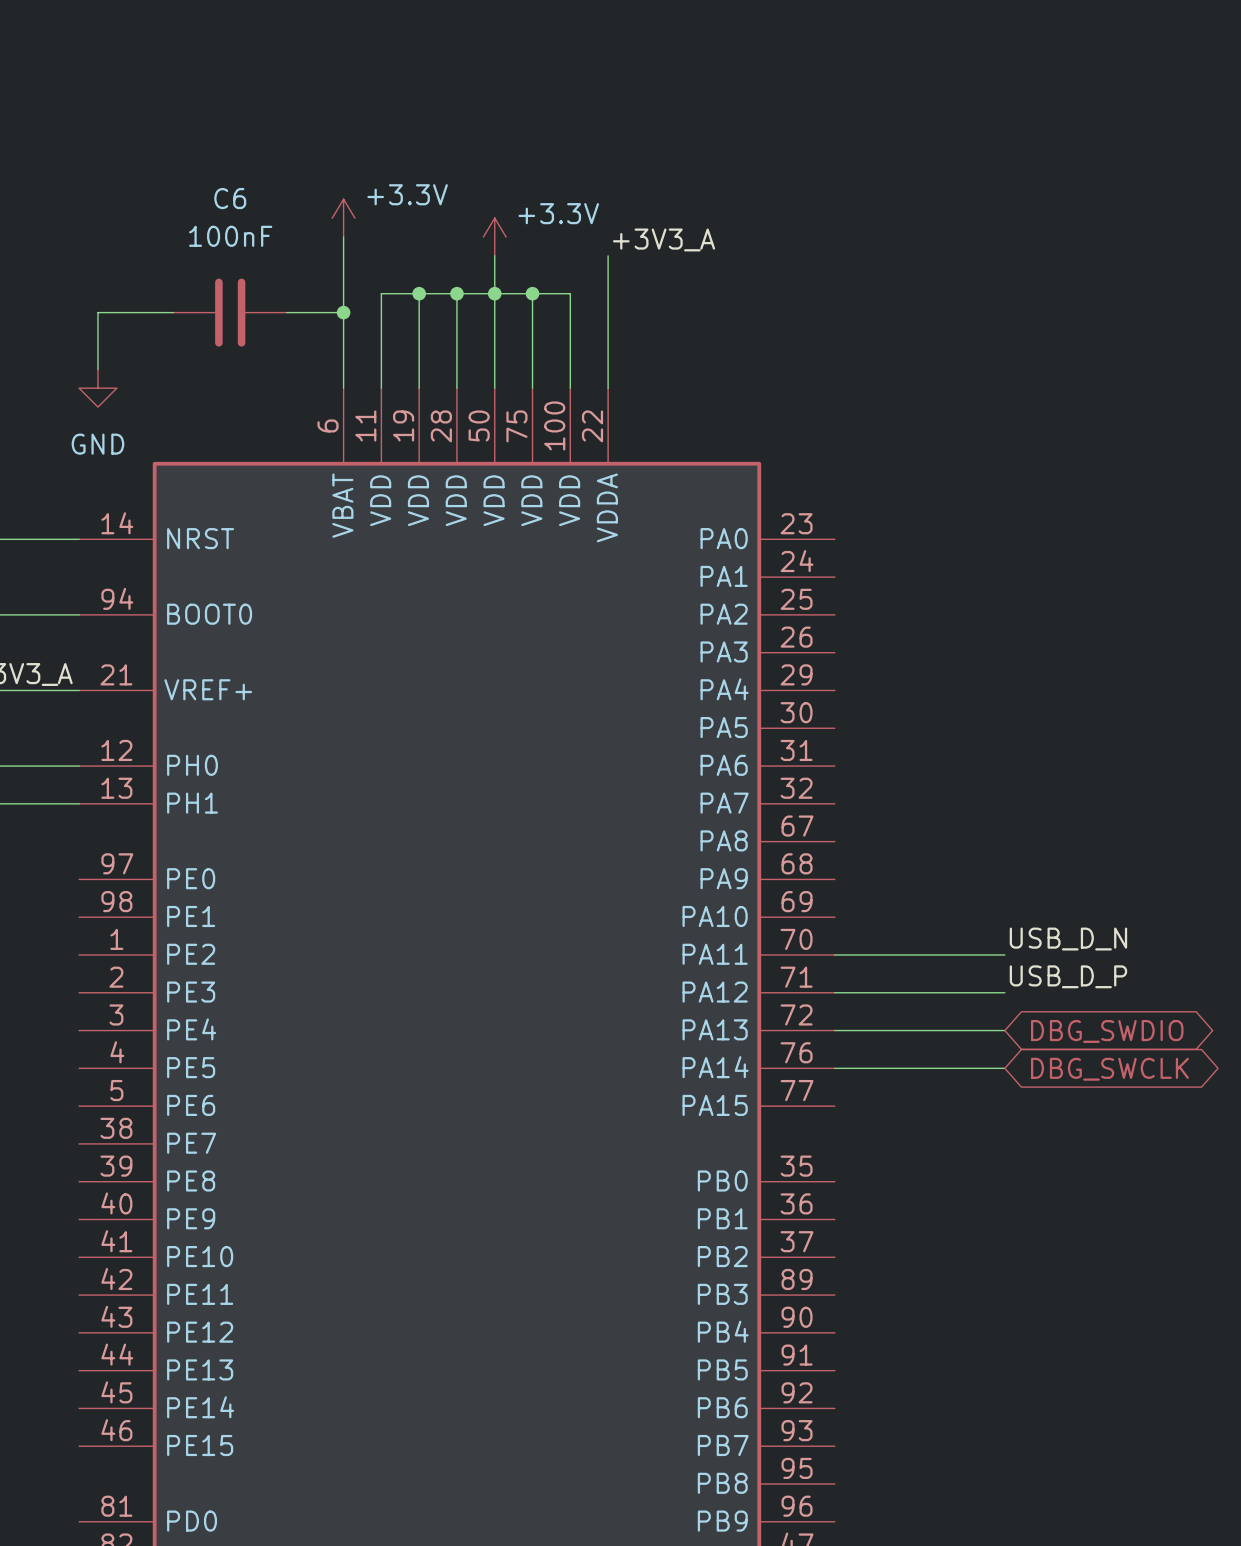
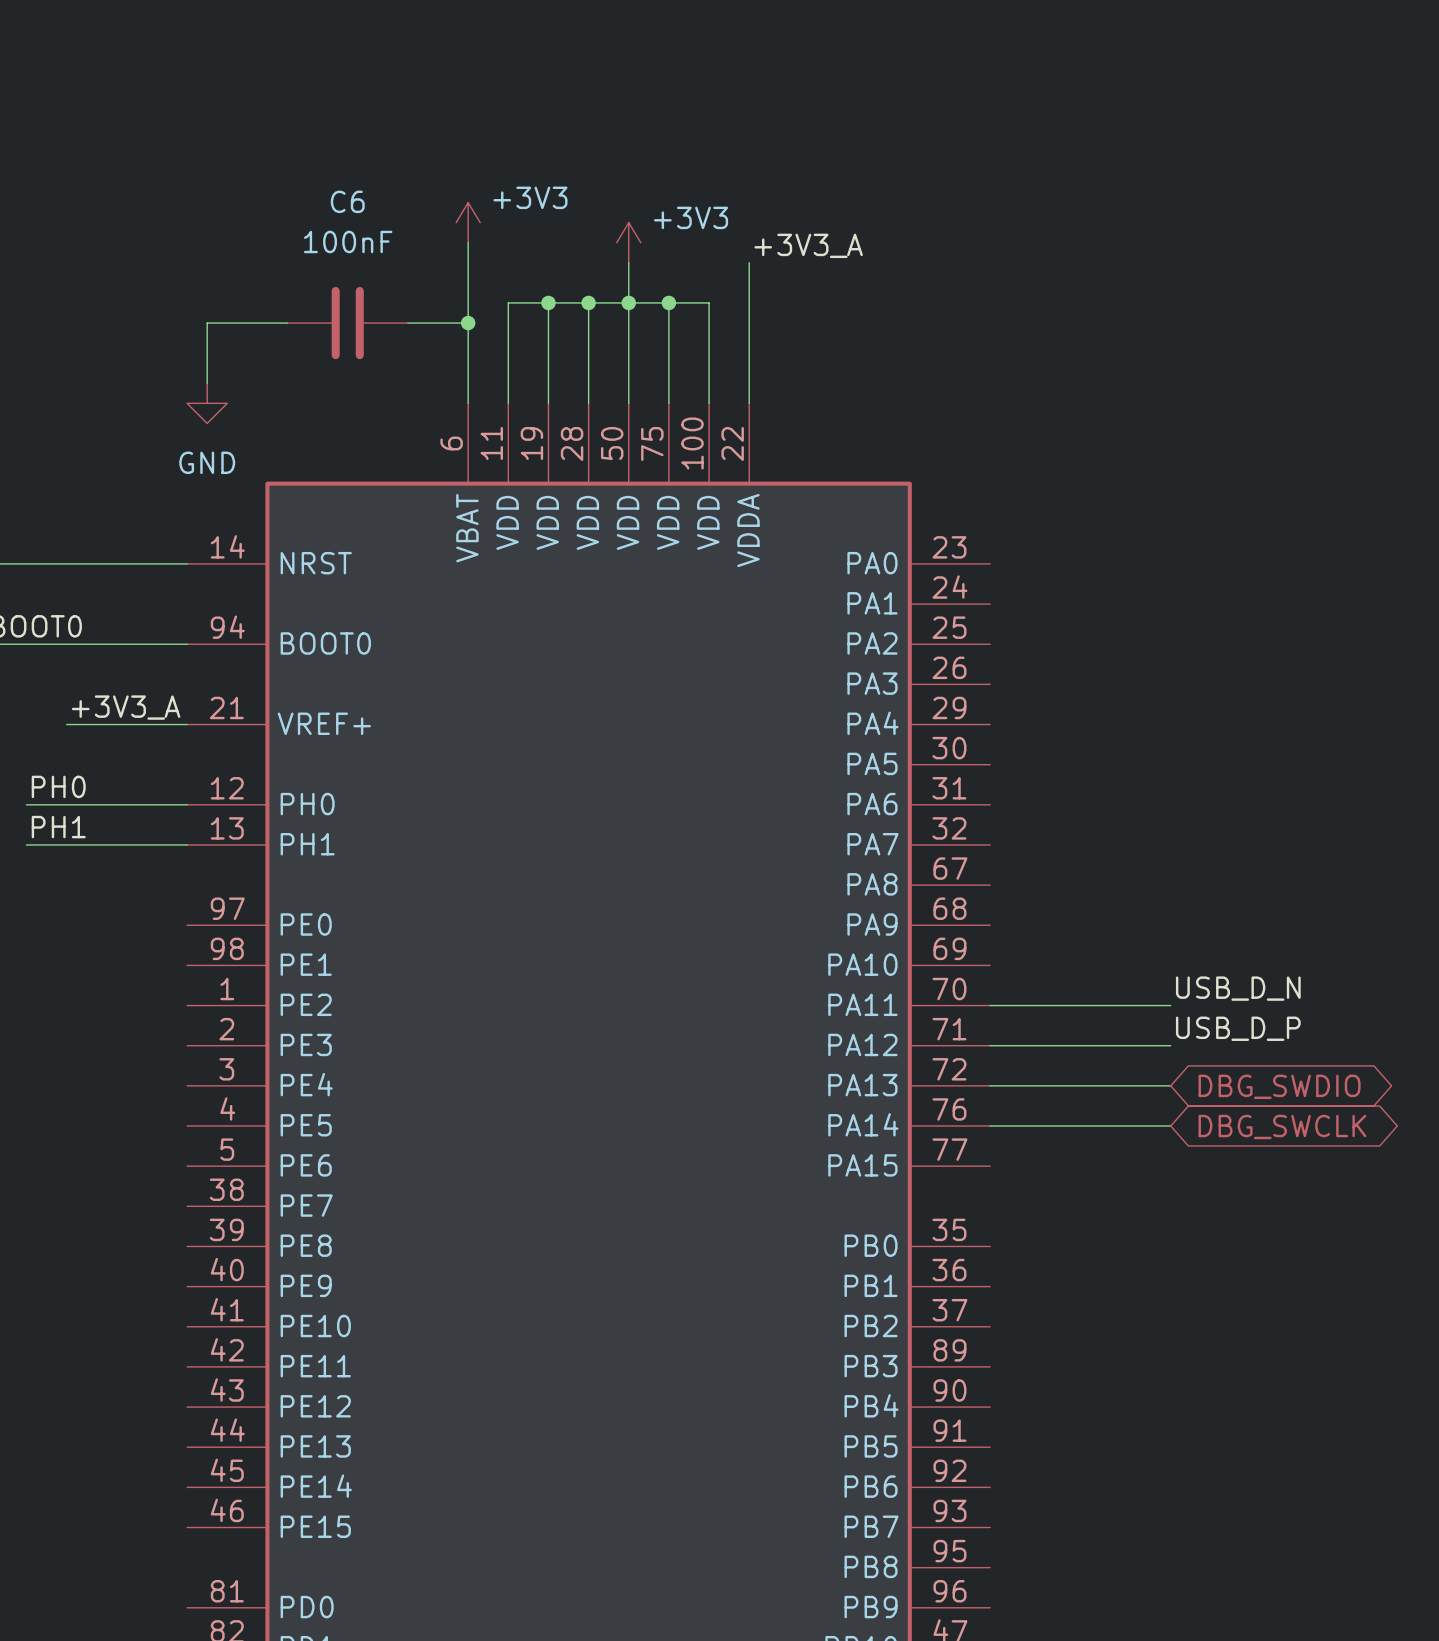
power symbol: +3.3V (343, 218) -> +3V3 (468, 222)
power symbol: +3.3V (494, 237) -> +3V3 (628, 242)

